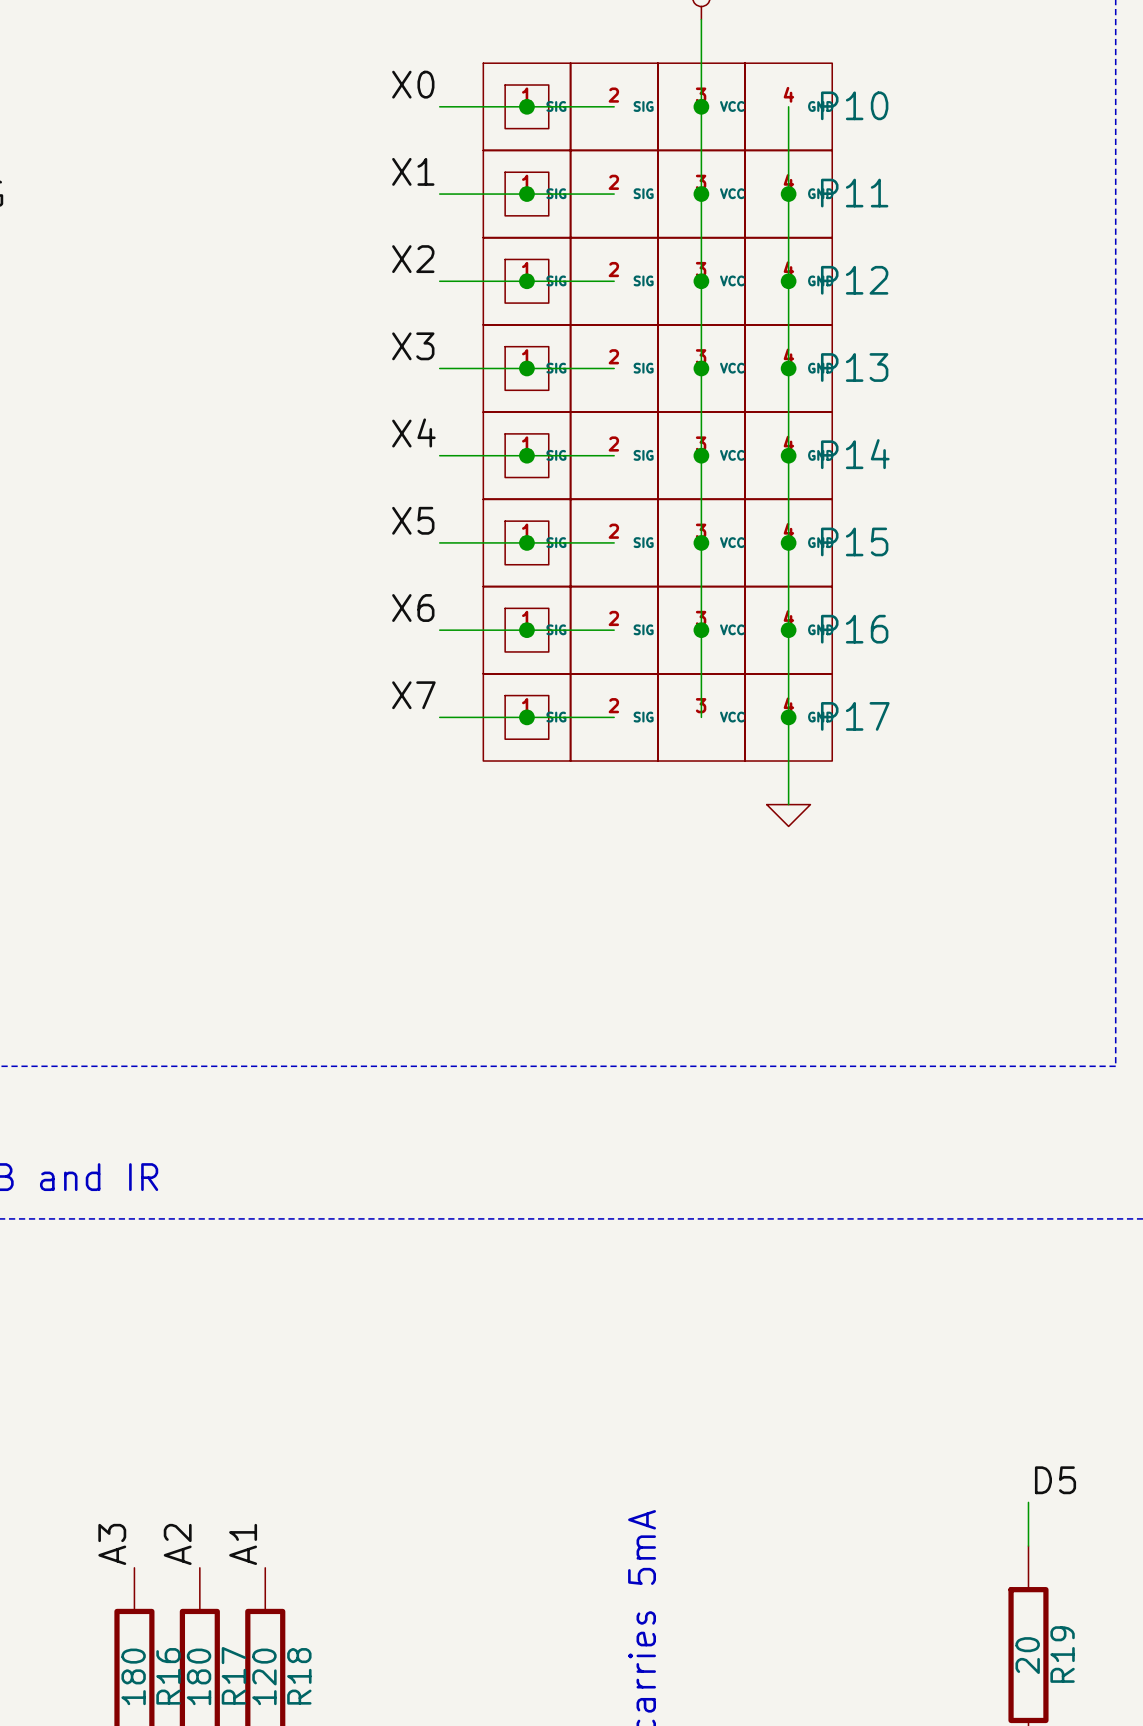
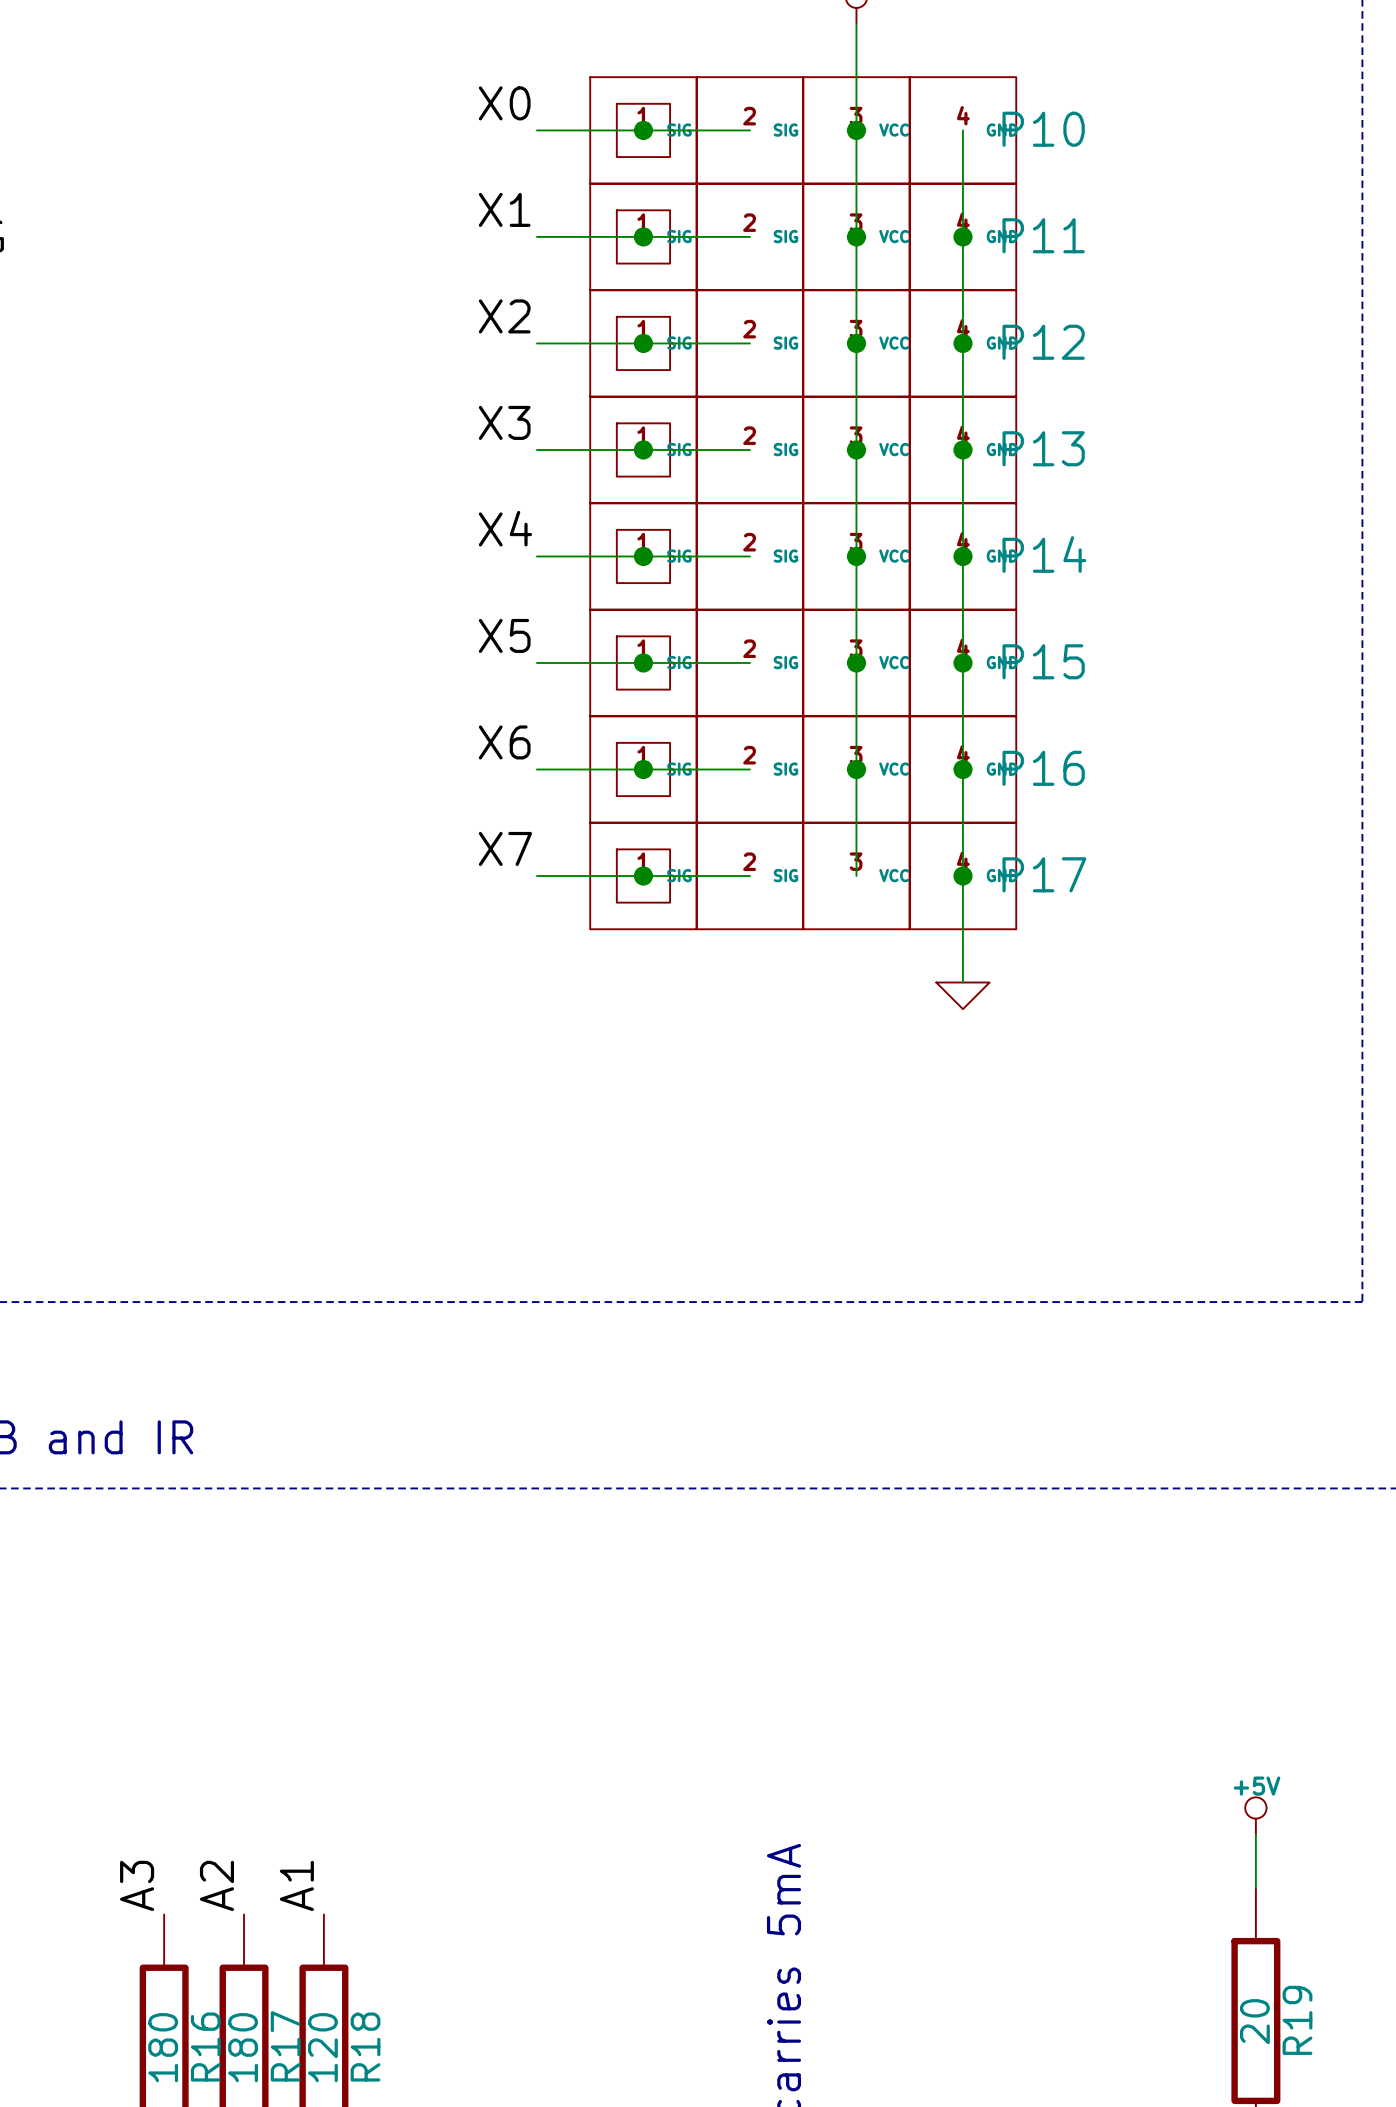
label: D5 (1055, 1480) -> none
power symbol: none -> +5V (1255, 1815)

